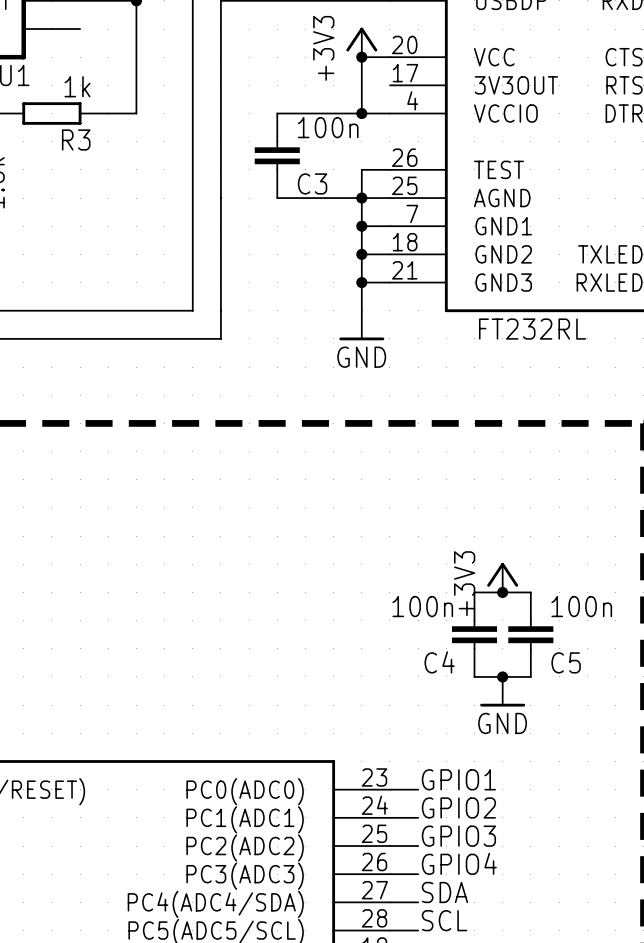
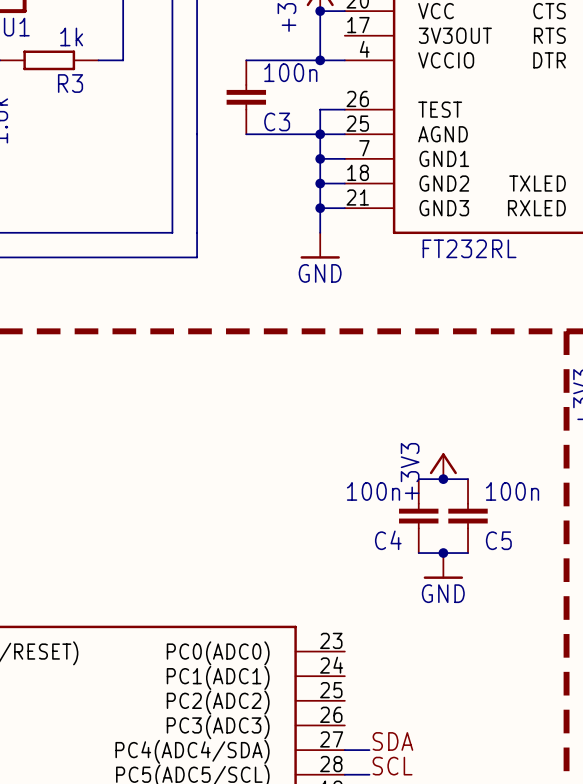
label: GPIO1 (458, 779) -> none
wire: (389, 789) (418, 789) -> none
label: GPIO2 (458, 807) -> none
wire: (389, 817) (418, 817) -> none
label: GPIO3 (458, 836) -> none
wire: (389, 846) (418, 846) -> none
label: GPIO4 (459, 863) -> none
wire: (389, 874) (418, 874) -> none

